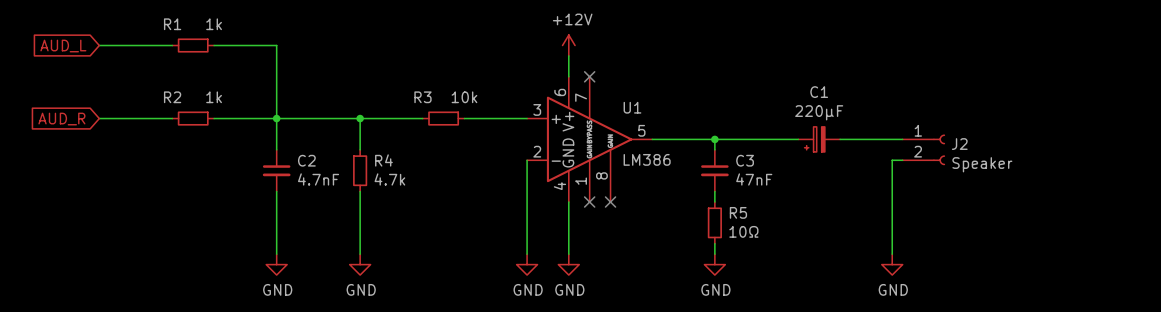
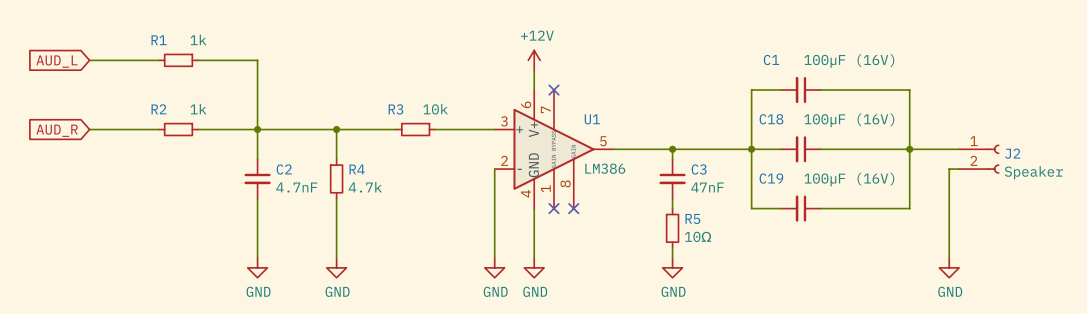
wire: none -> (781, 90) (751, 90) (751, 208) (781, 208)
wire: none -> (820, 90) (909, 90) (909, 208) (820, 208)
C1 name position: C1 (819, 92) -> C1 (771, 60)
C1 value: 220µF (819, 112) -> 100µF (16V) (849, 60)
C1 symbol: [798, 126, 841, 152] -> [781, 76, 821, 104]
junction: none -> (751, 149)
C18: none -> 100µF (16V) (801, 149)
wire: none -> (850, 149) (959, 149)
junction: none -> (909, 149)
J2 position: (923, 149) -> (979, 159)
wire: (902, 160) (892, 160) (892, 254) -> (959, 169) (949, 169) (949, 257)
C19: none -> 100µF (16V) (801, 208)
power symbol position: GND (892, 264) -> GND (949, 267)

